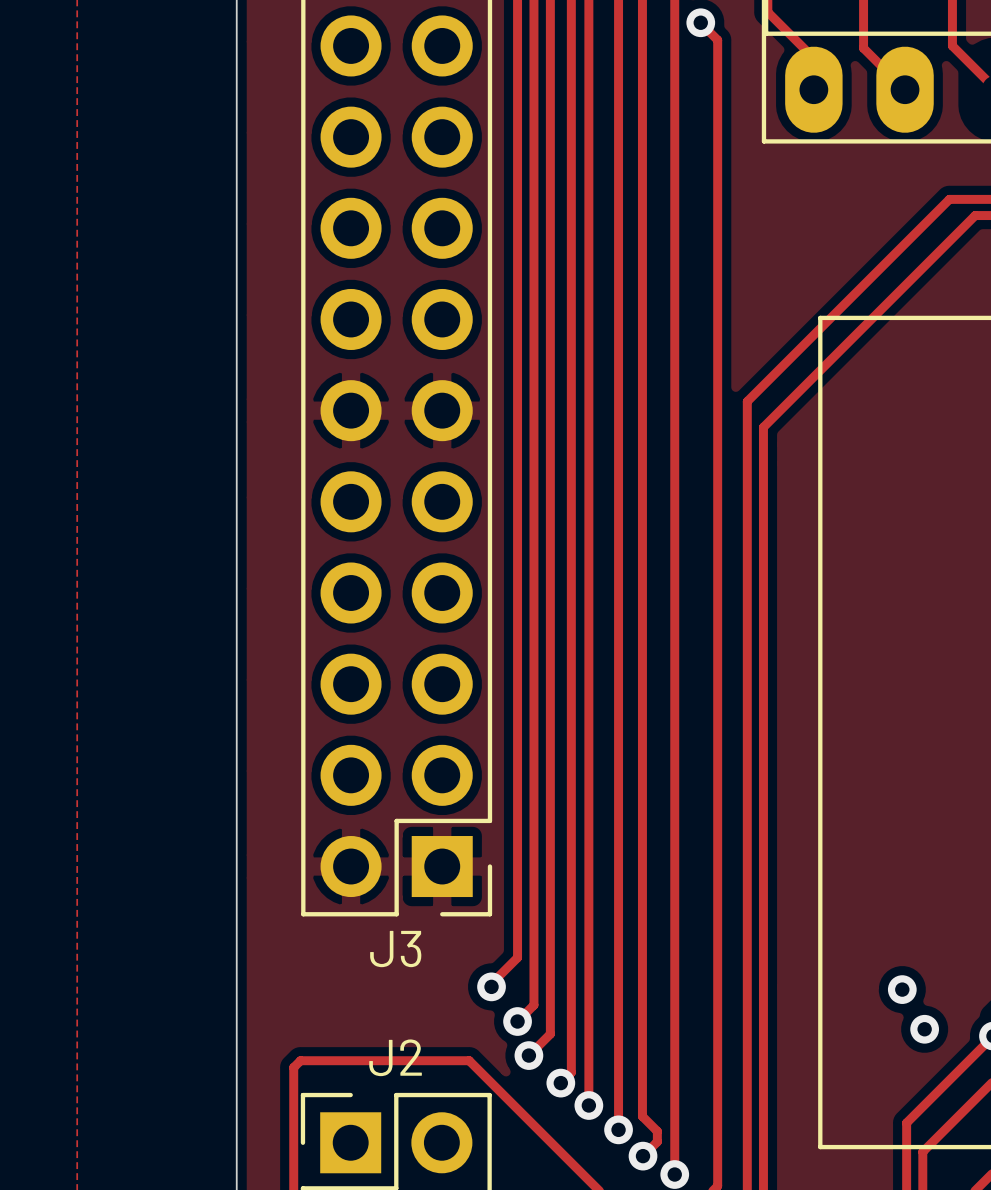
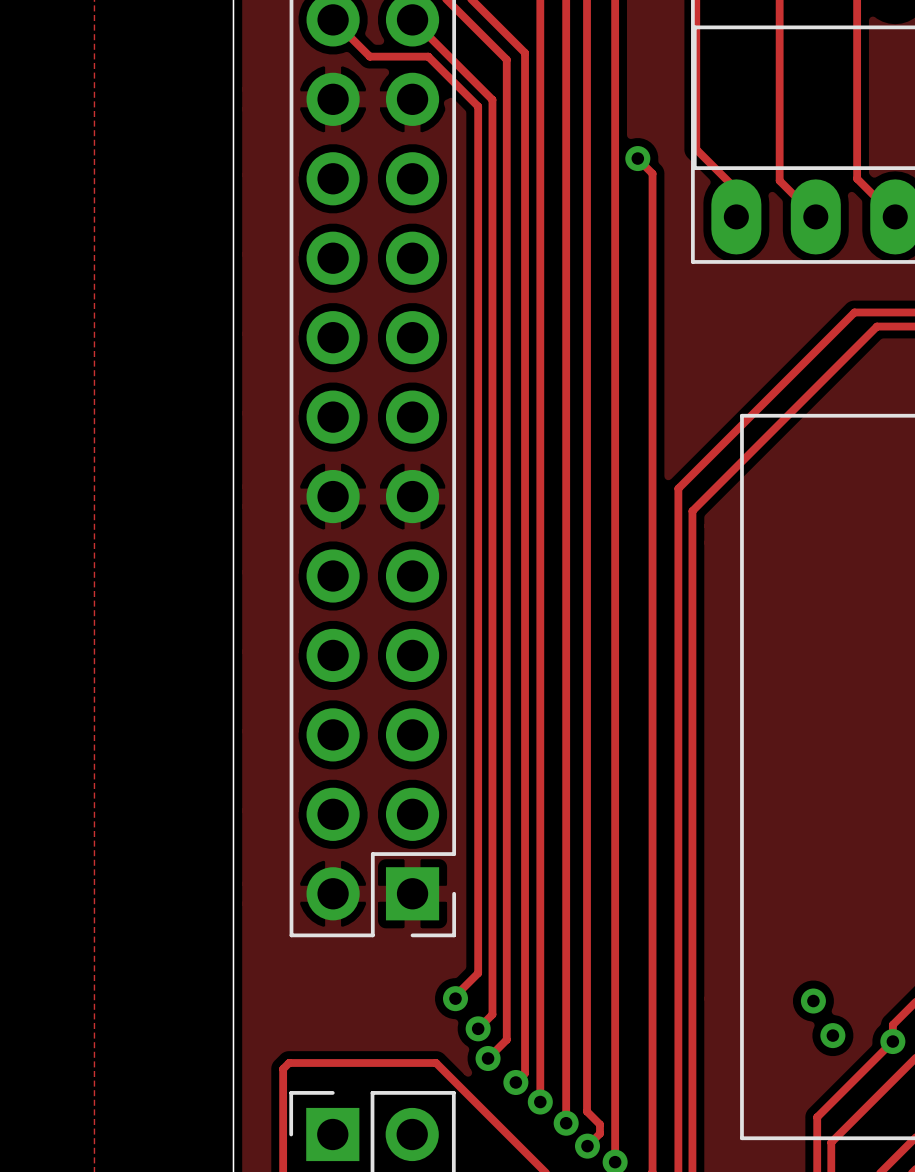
J3 name: J3 (395, 949) -> none
J2 name: J2 (395, 1057) -> none

